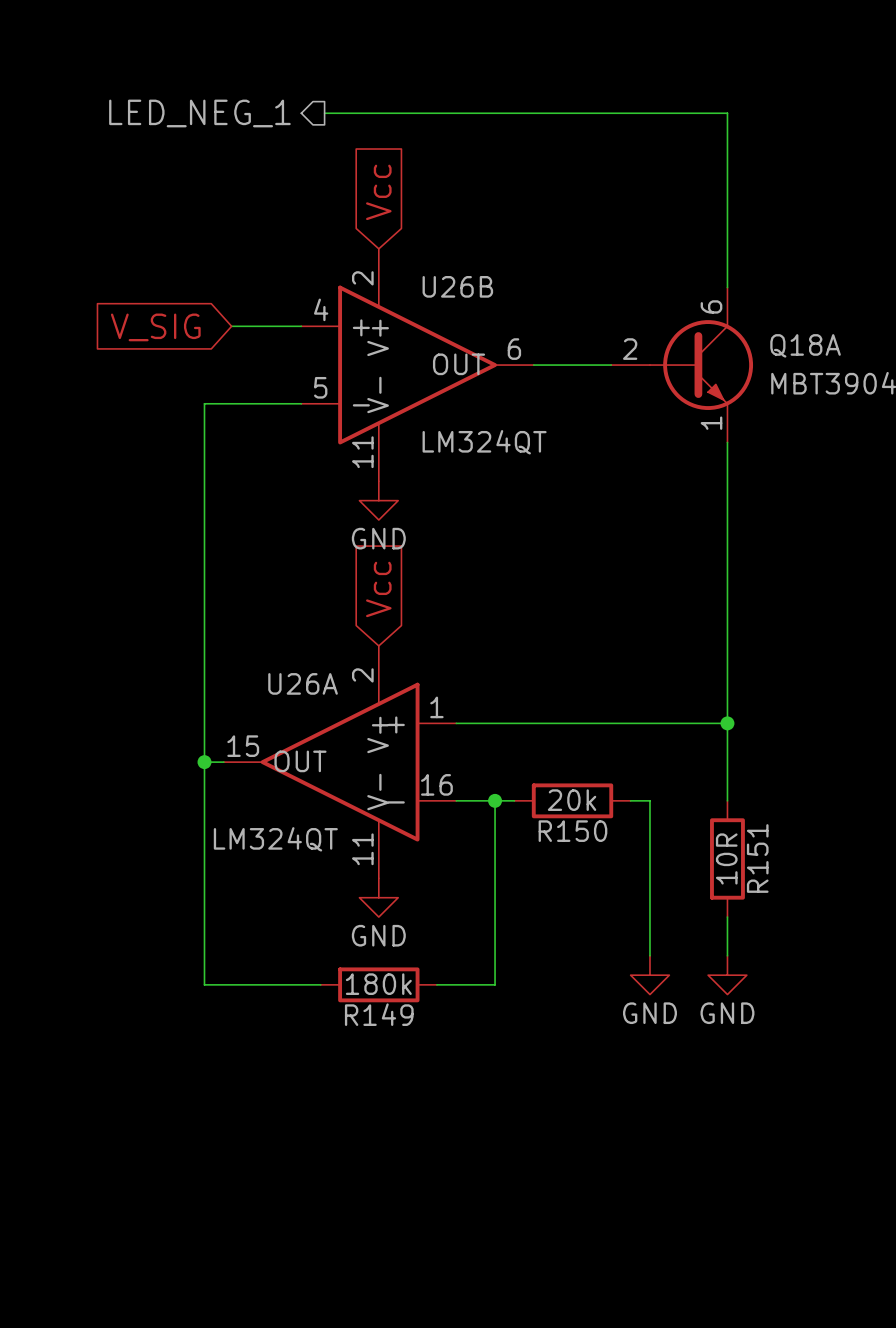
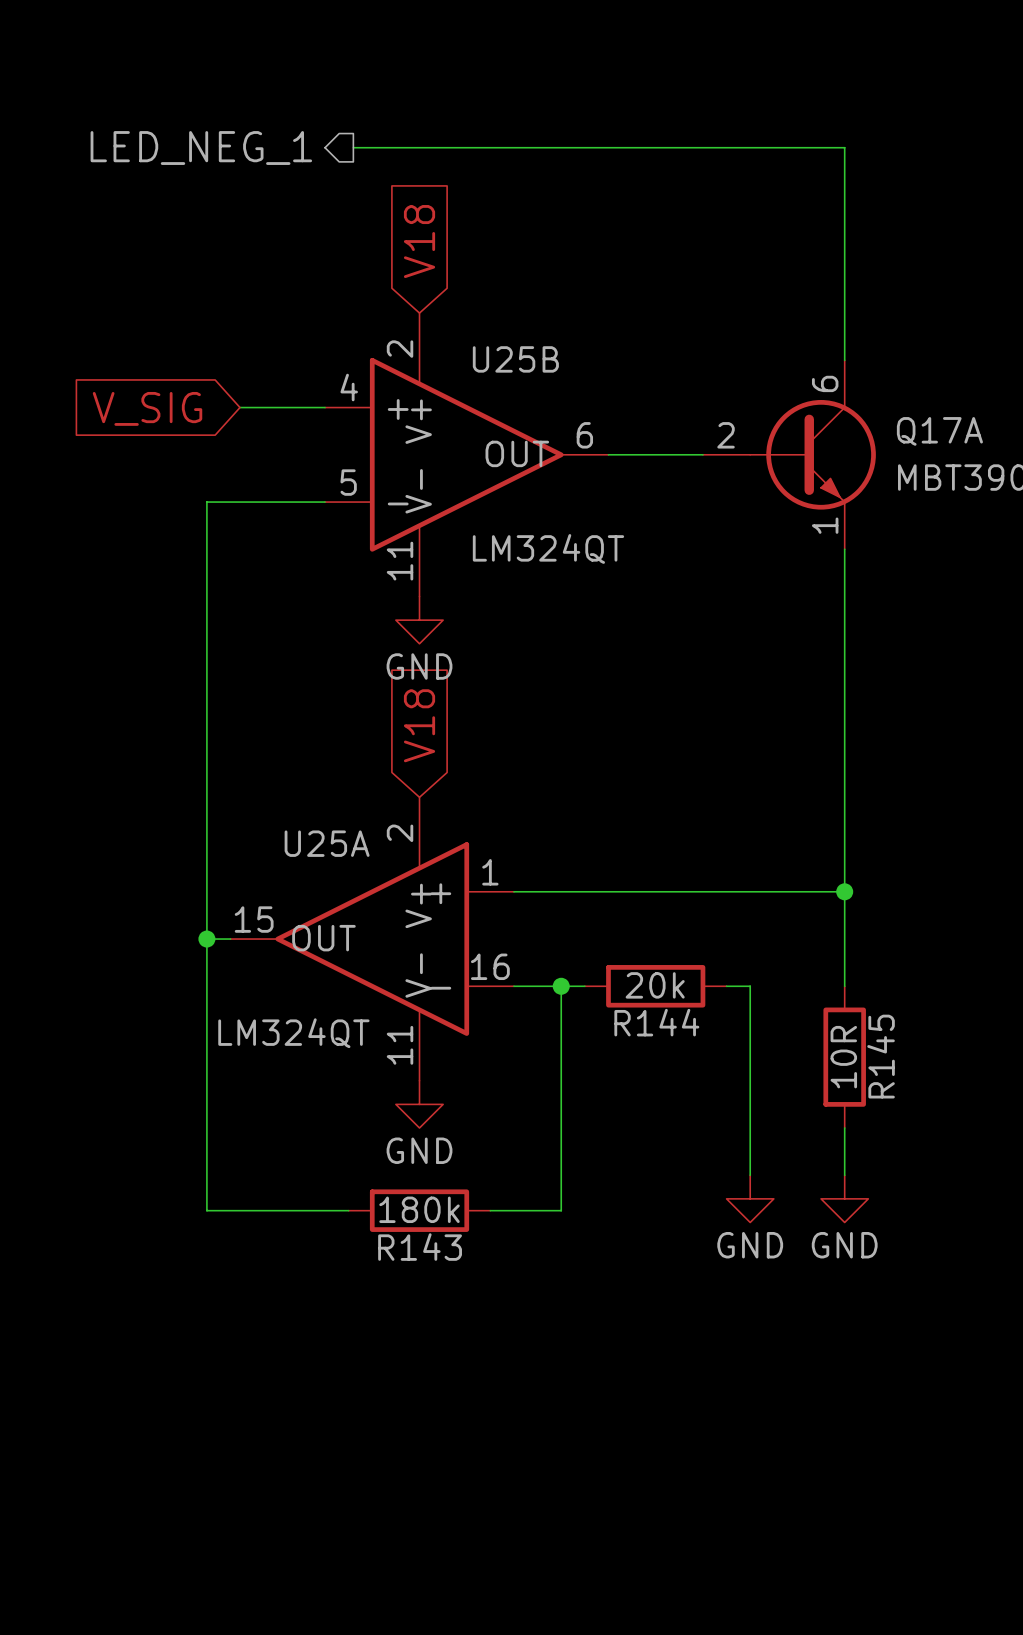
global label: Vcc (378, 192) -> V18 (419, 241)
U26B name: U26B (457, 286) -> U25B (515, 359)
Q18A name: Q18A (805, 345) -> Q17A (939, 431)
global label: Vcc (378, 589) -> V18 (419, 725)
U26A name: U26A (303, 683) -> U25A (327, 843)
R150 name: R150 (572, 831) -> R144 (656, 1022)
R151 name: R151 (757, 858) -> R145 (881, 1056)
R149 name: R149 (379, 1014) -> R143 (420, 1247)

